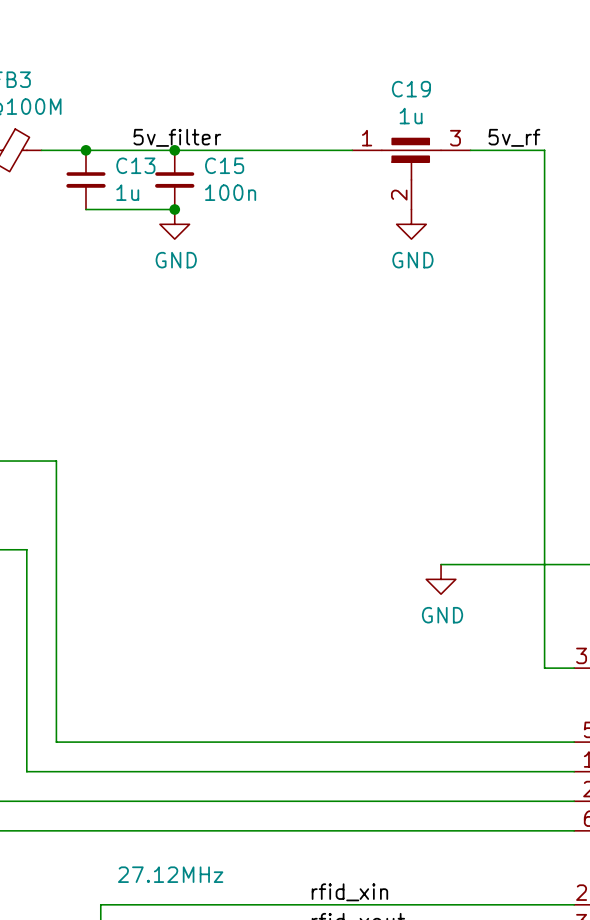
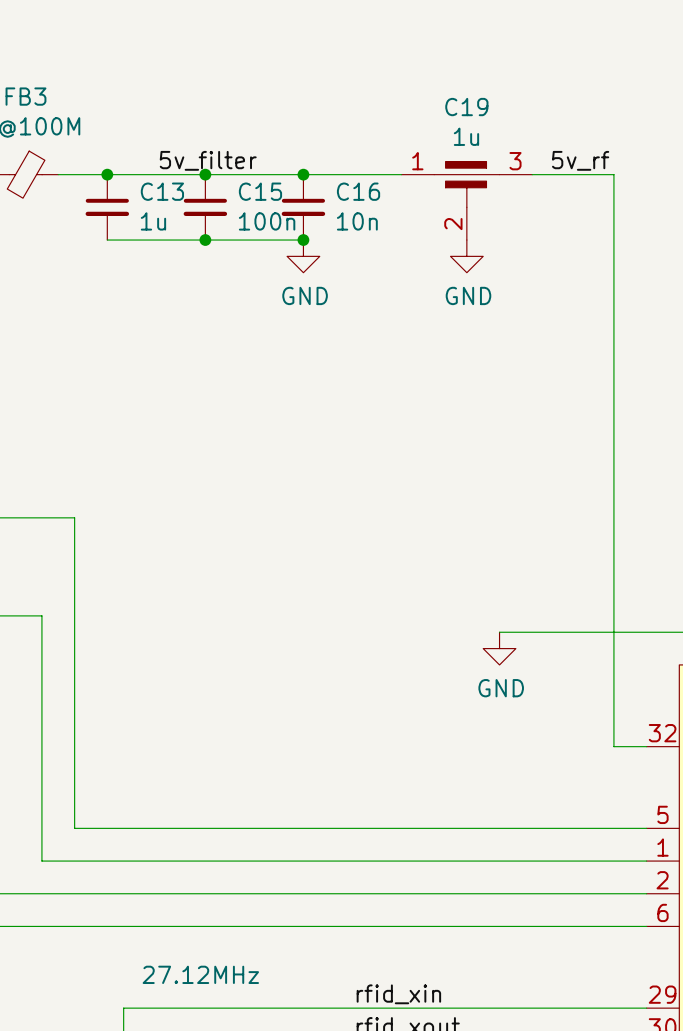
junction: none -> (303, 174)
C16: none -> 10n (303, 207)
wire: none -> (205, 240) (303, 240)
junction: none -> (303, 240)
power symbol position: GND (174, 224) -> GND (303, 256)

